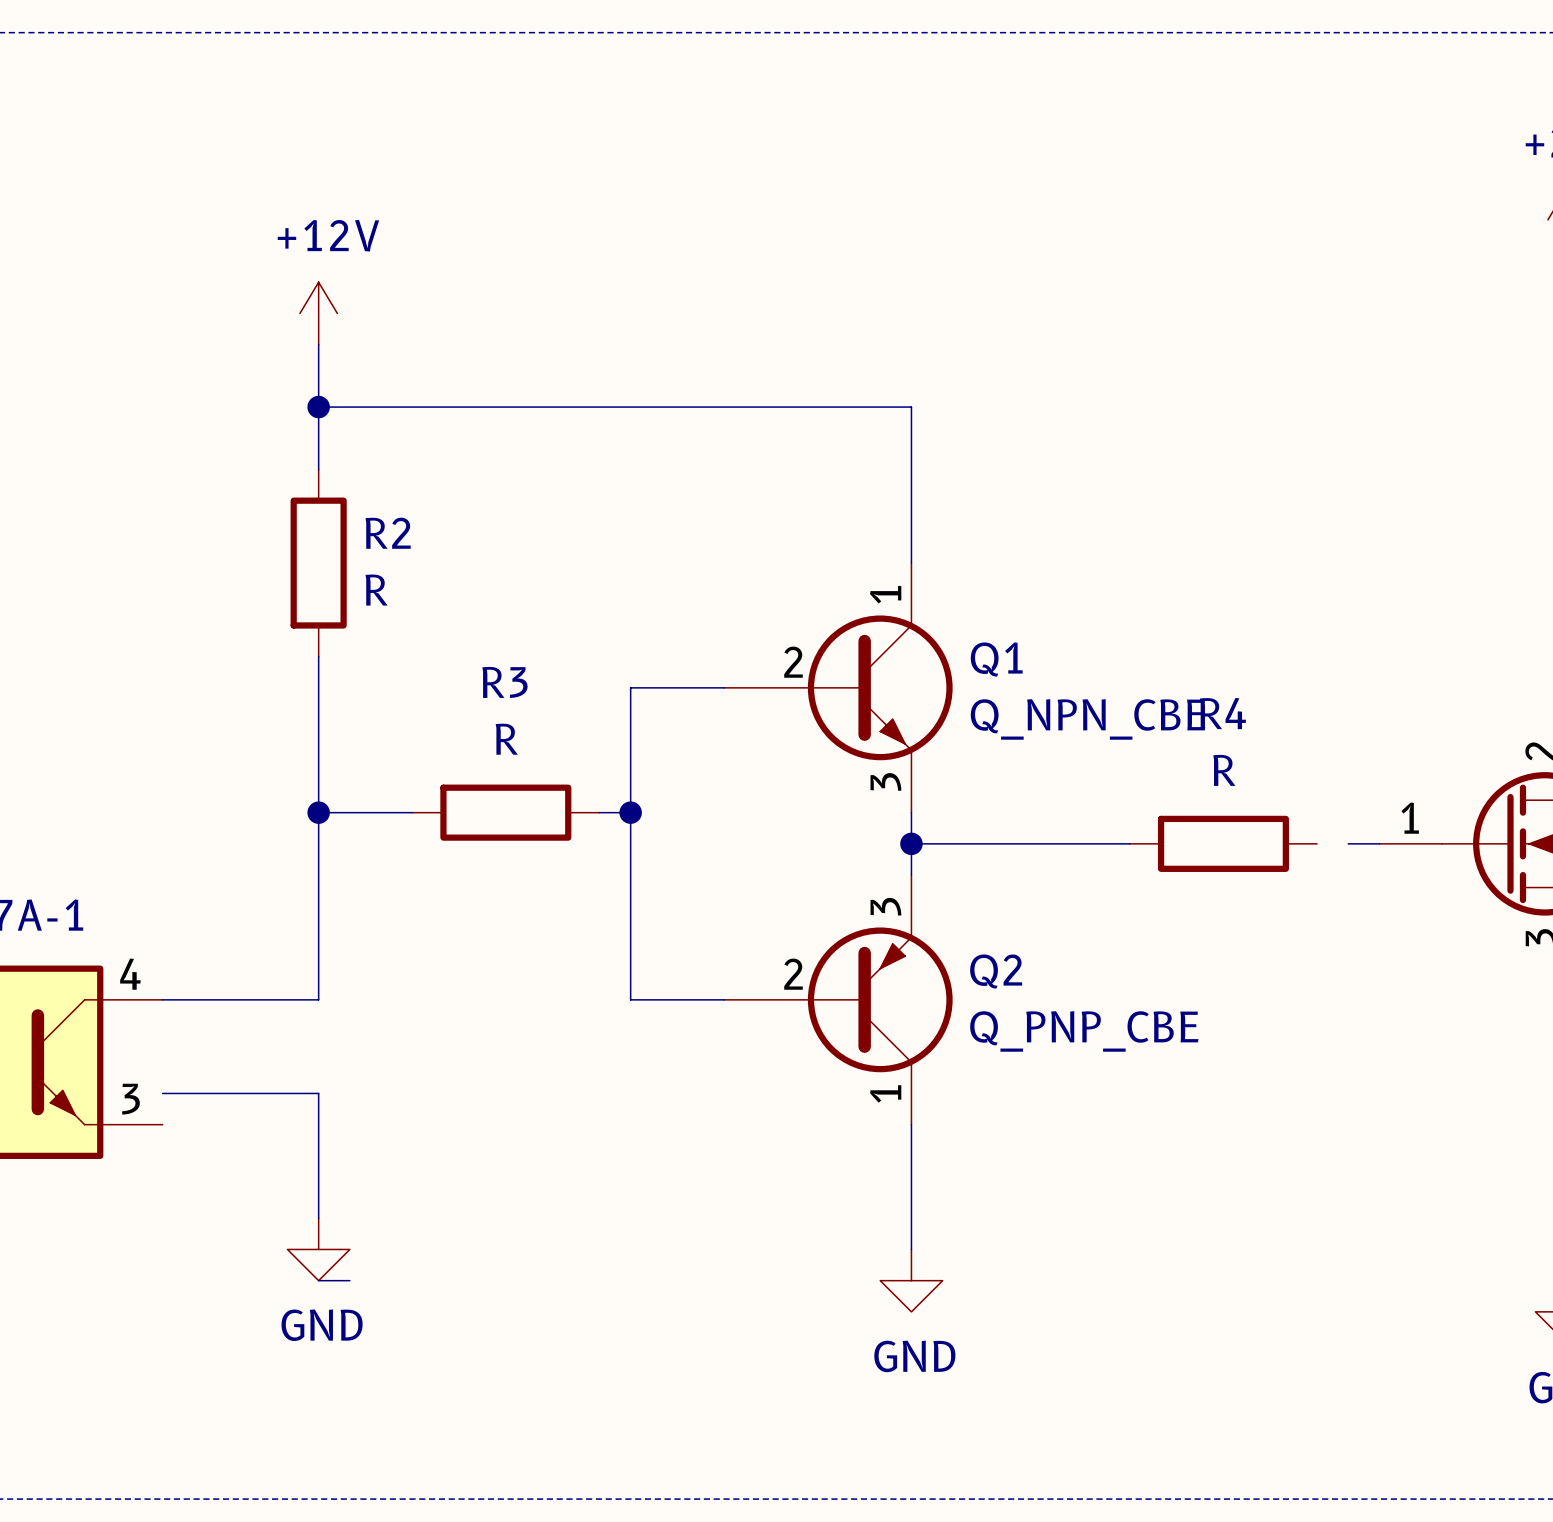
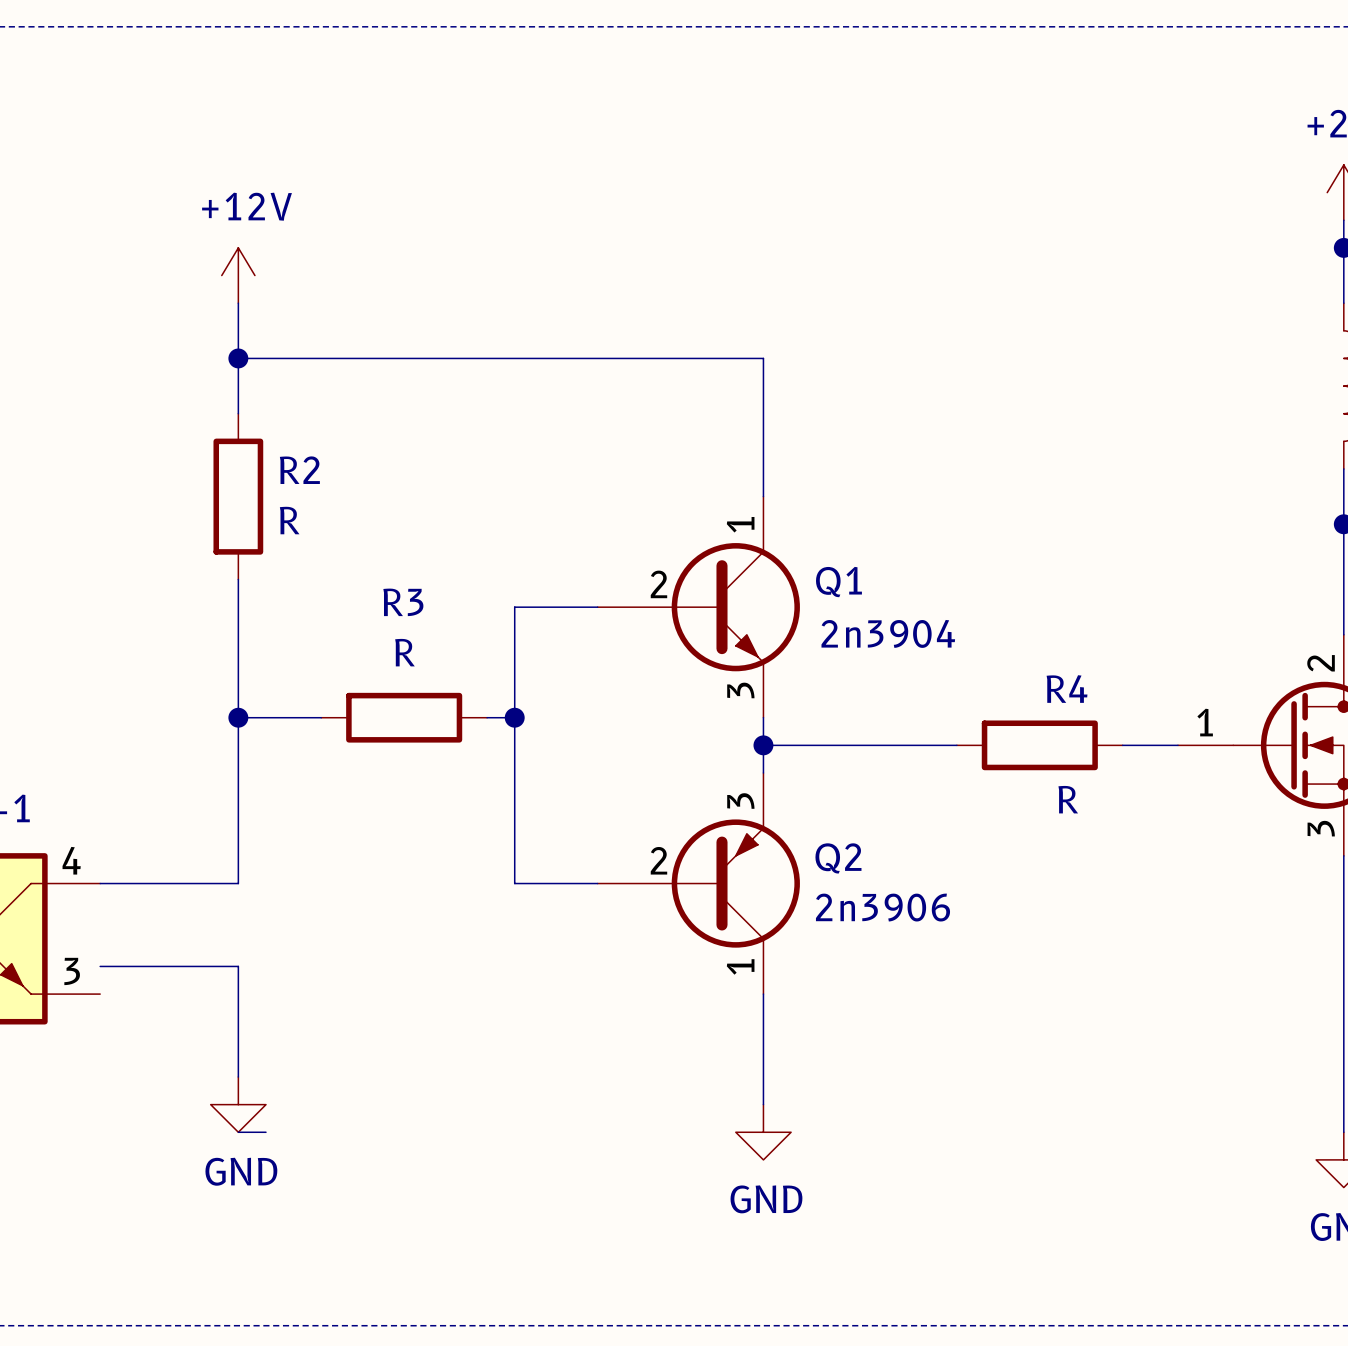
R4 name position: R4 (1222, 713) -> R4 (1067, 689)
Q1 value: Q_NPN_CBE (1087, 719) -> 2n3904 (888, 633)
R4 value position: R (1224, 770) -> R (1068, 799)
wire: none -> (1122, 745) (1150, 745)
Q2 value: Q_PNP_CBE (1084, 1031) -> 2n3906 (883, 907)

